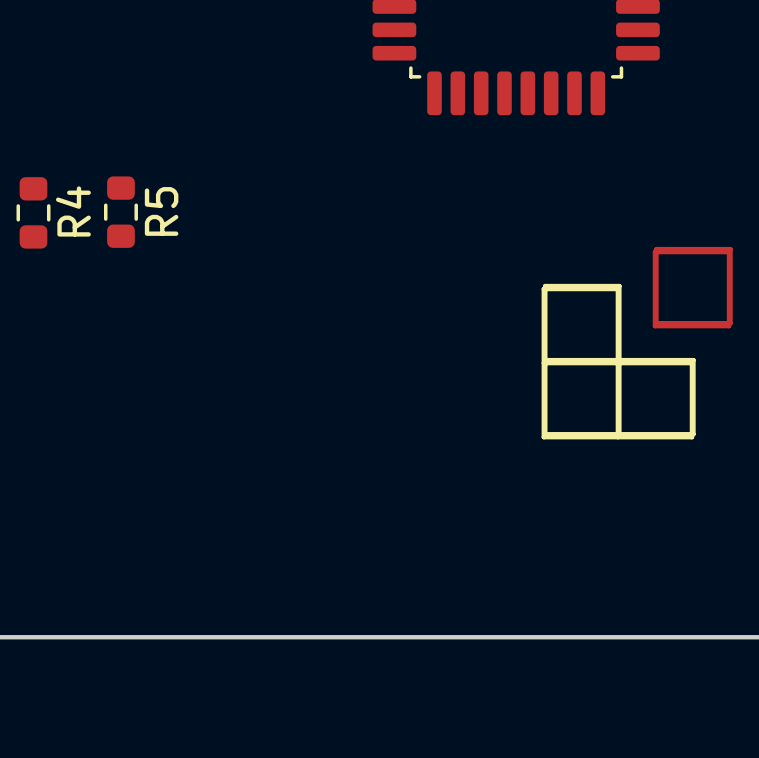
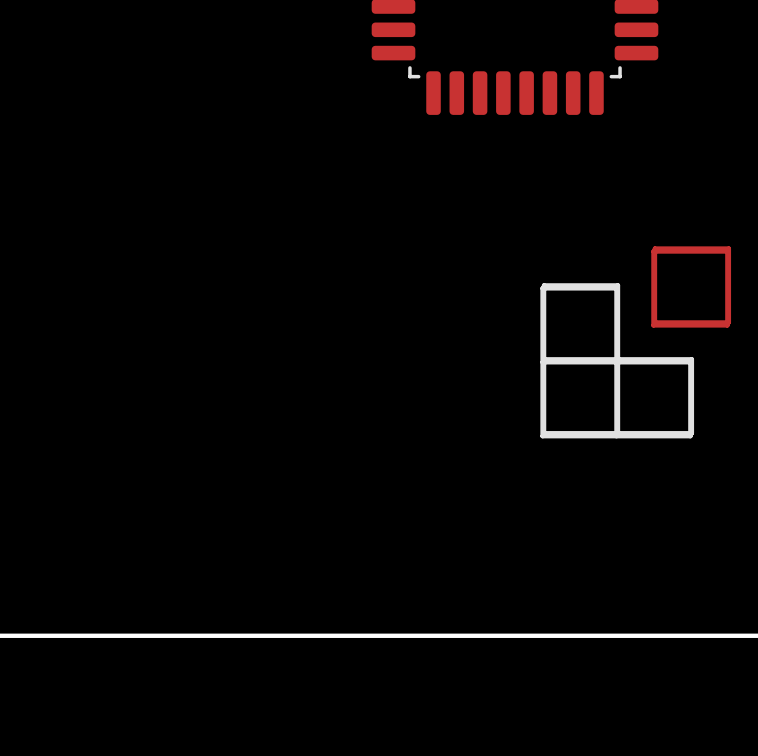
R4: (33, 212) -> none
R5: (120, 212) -> none

